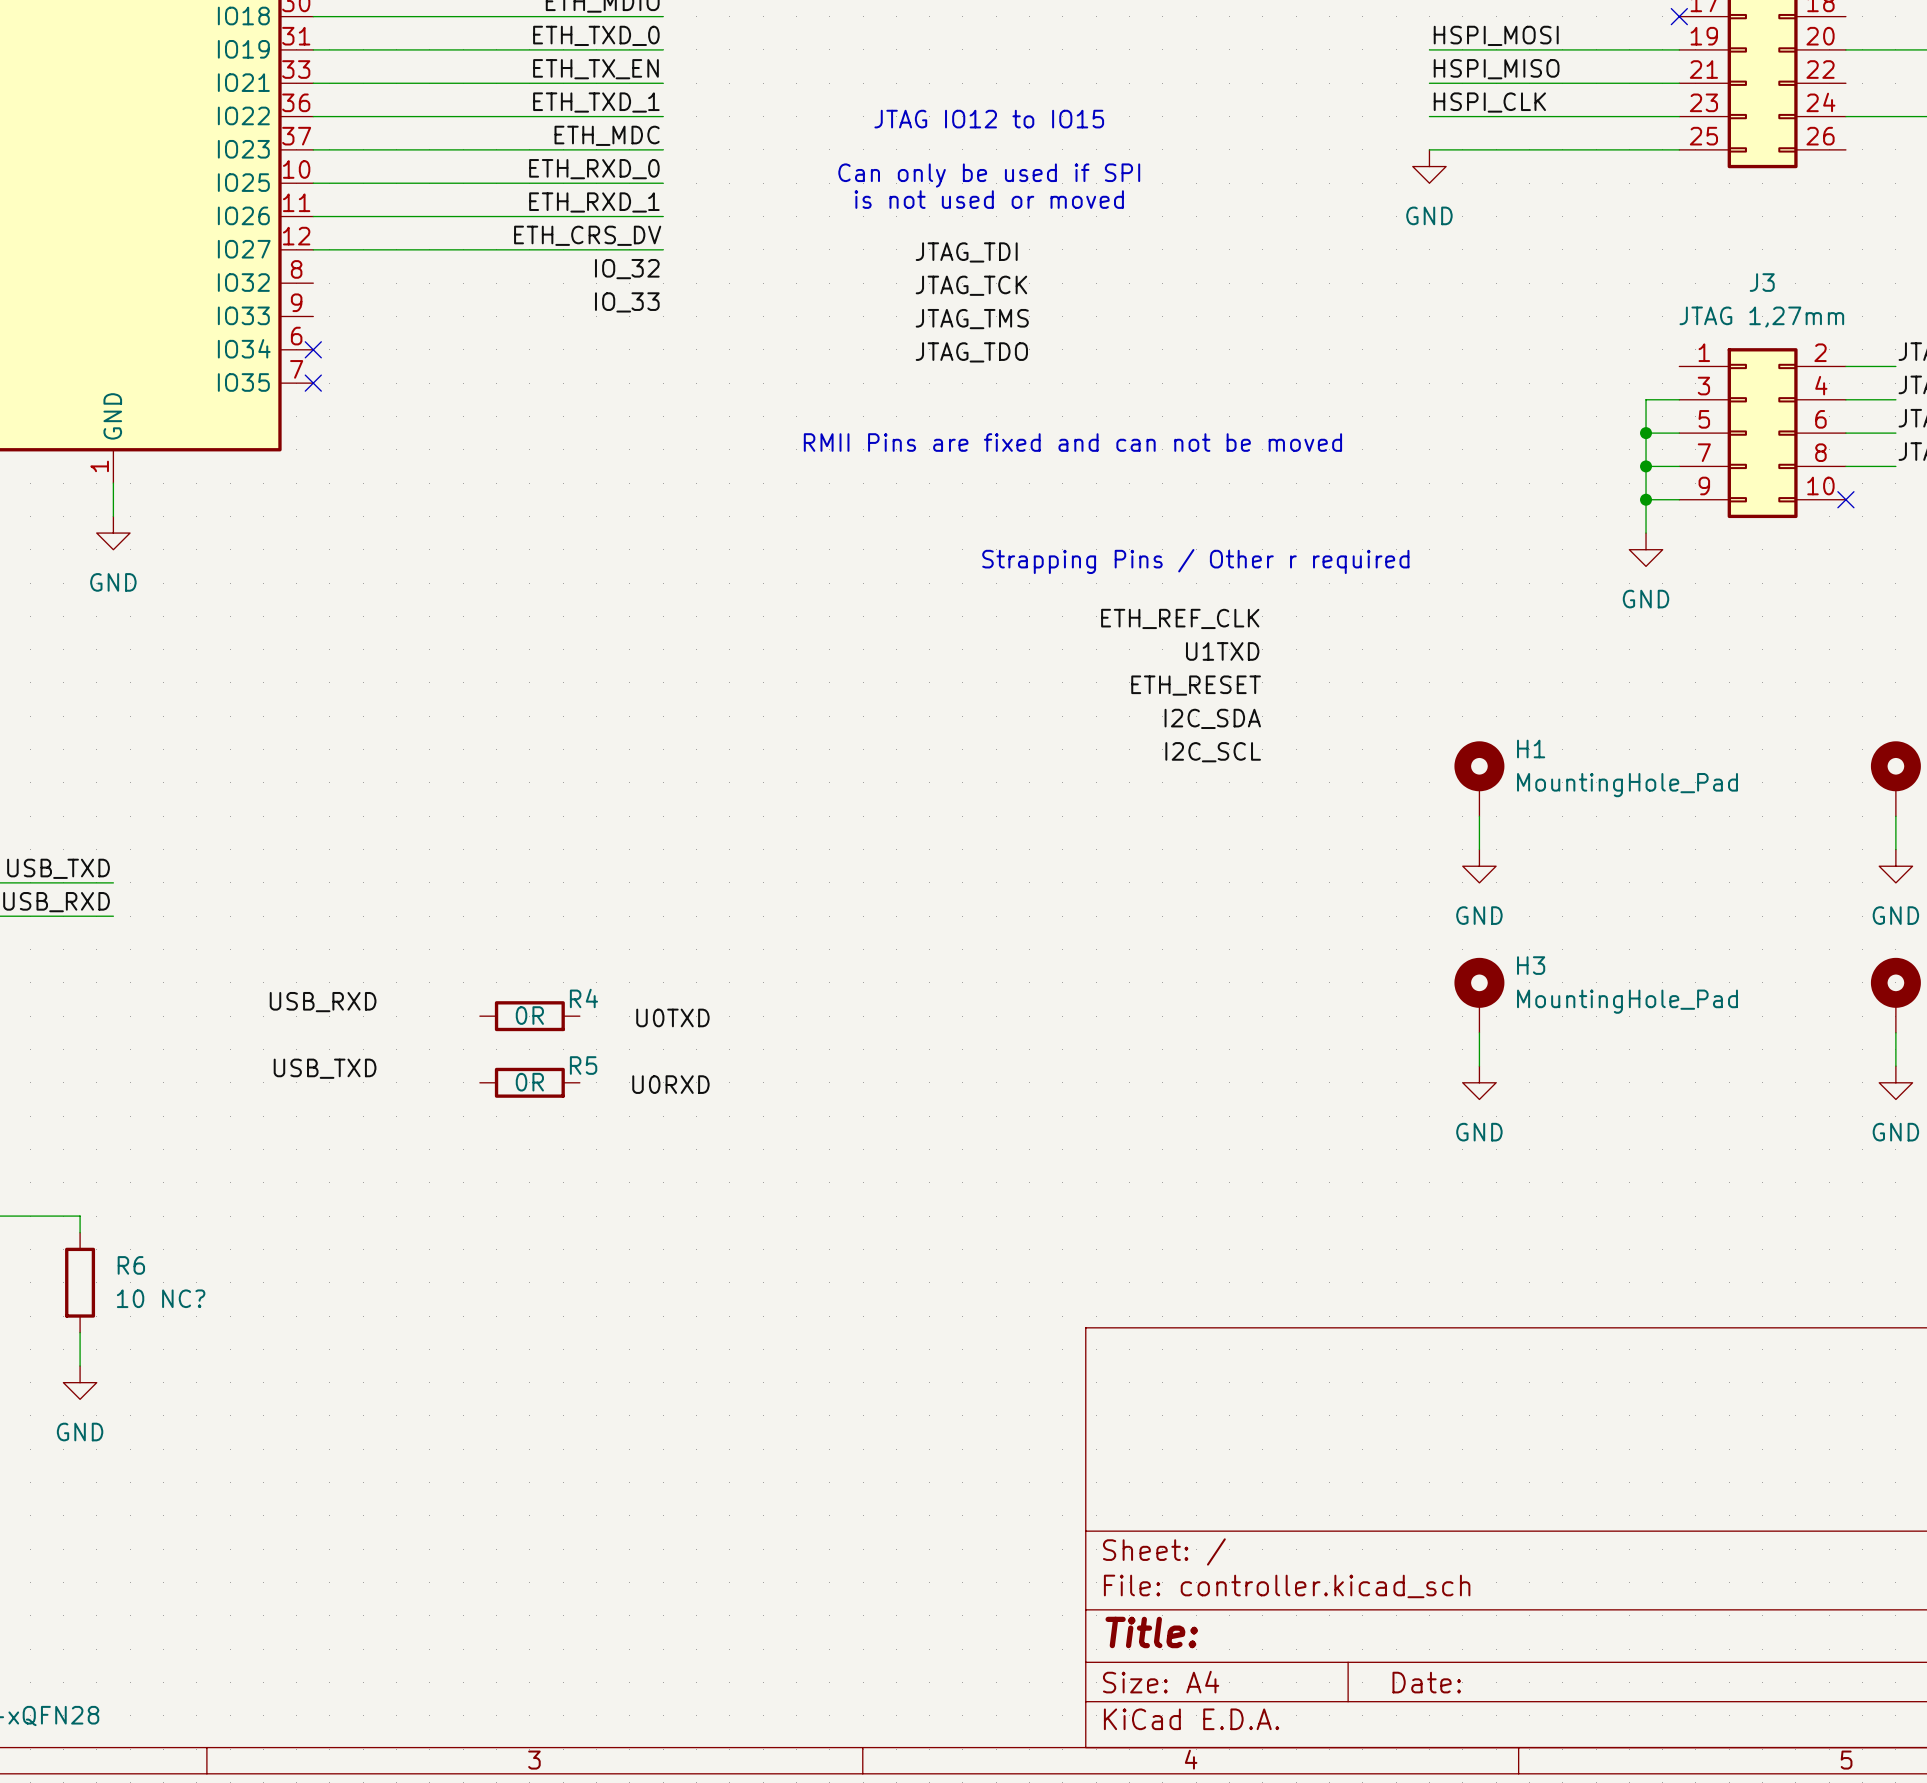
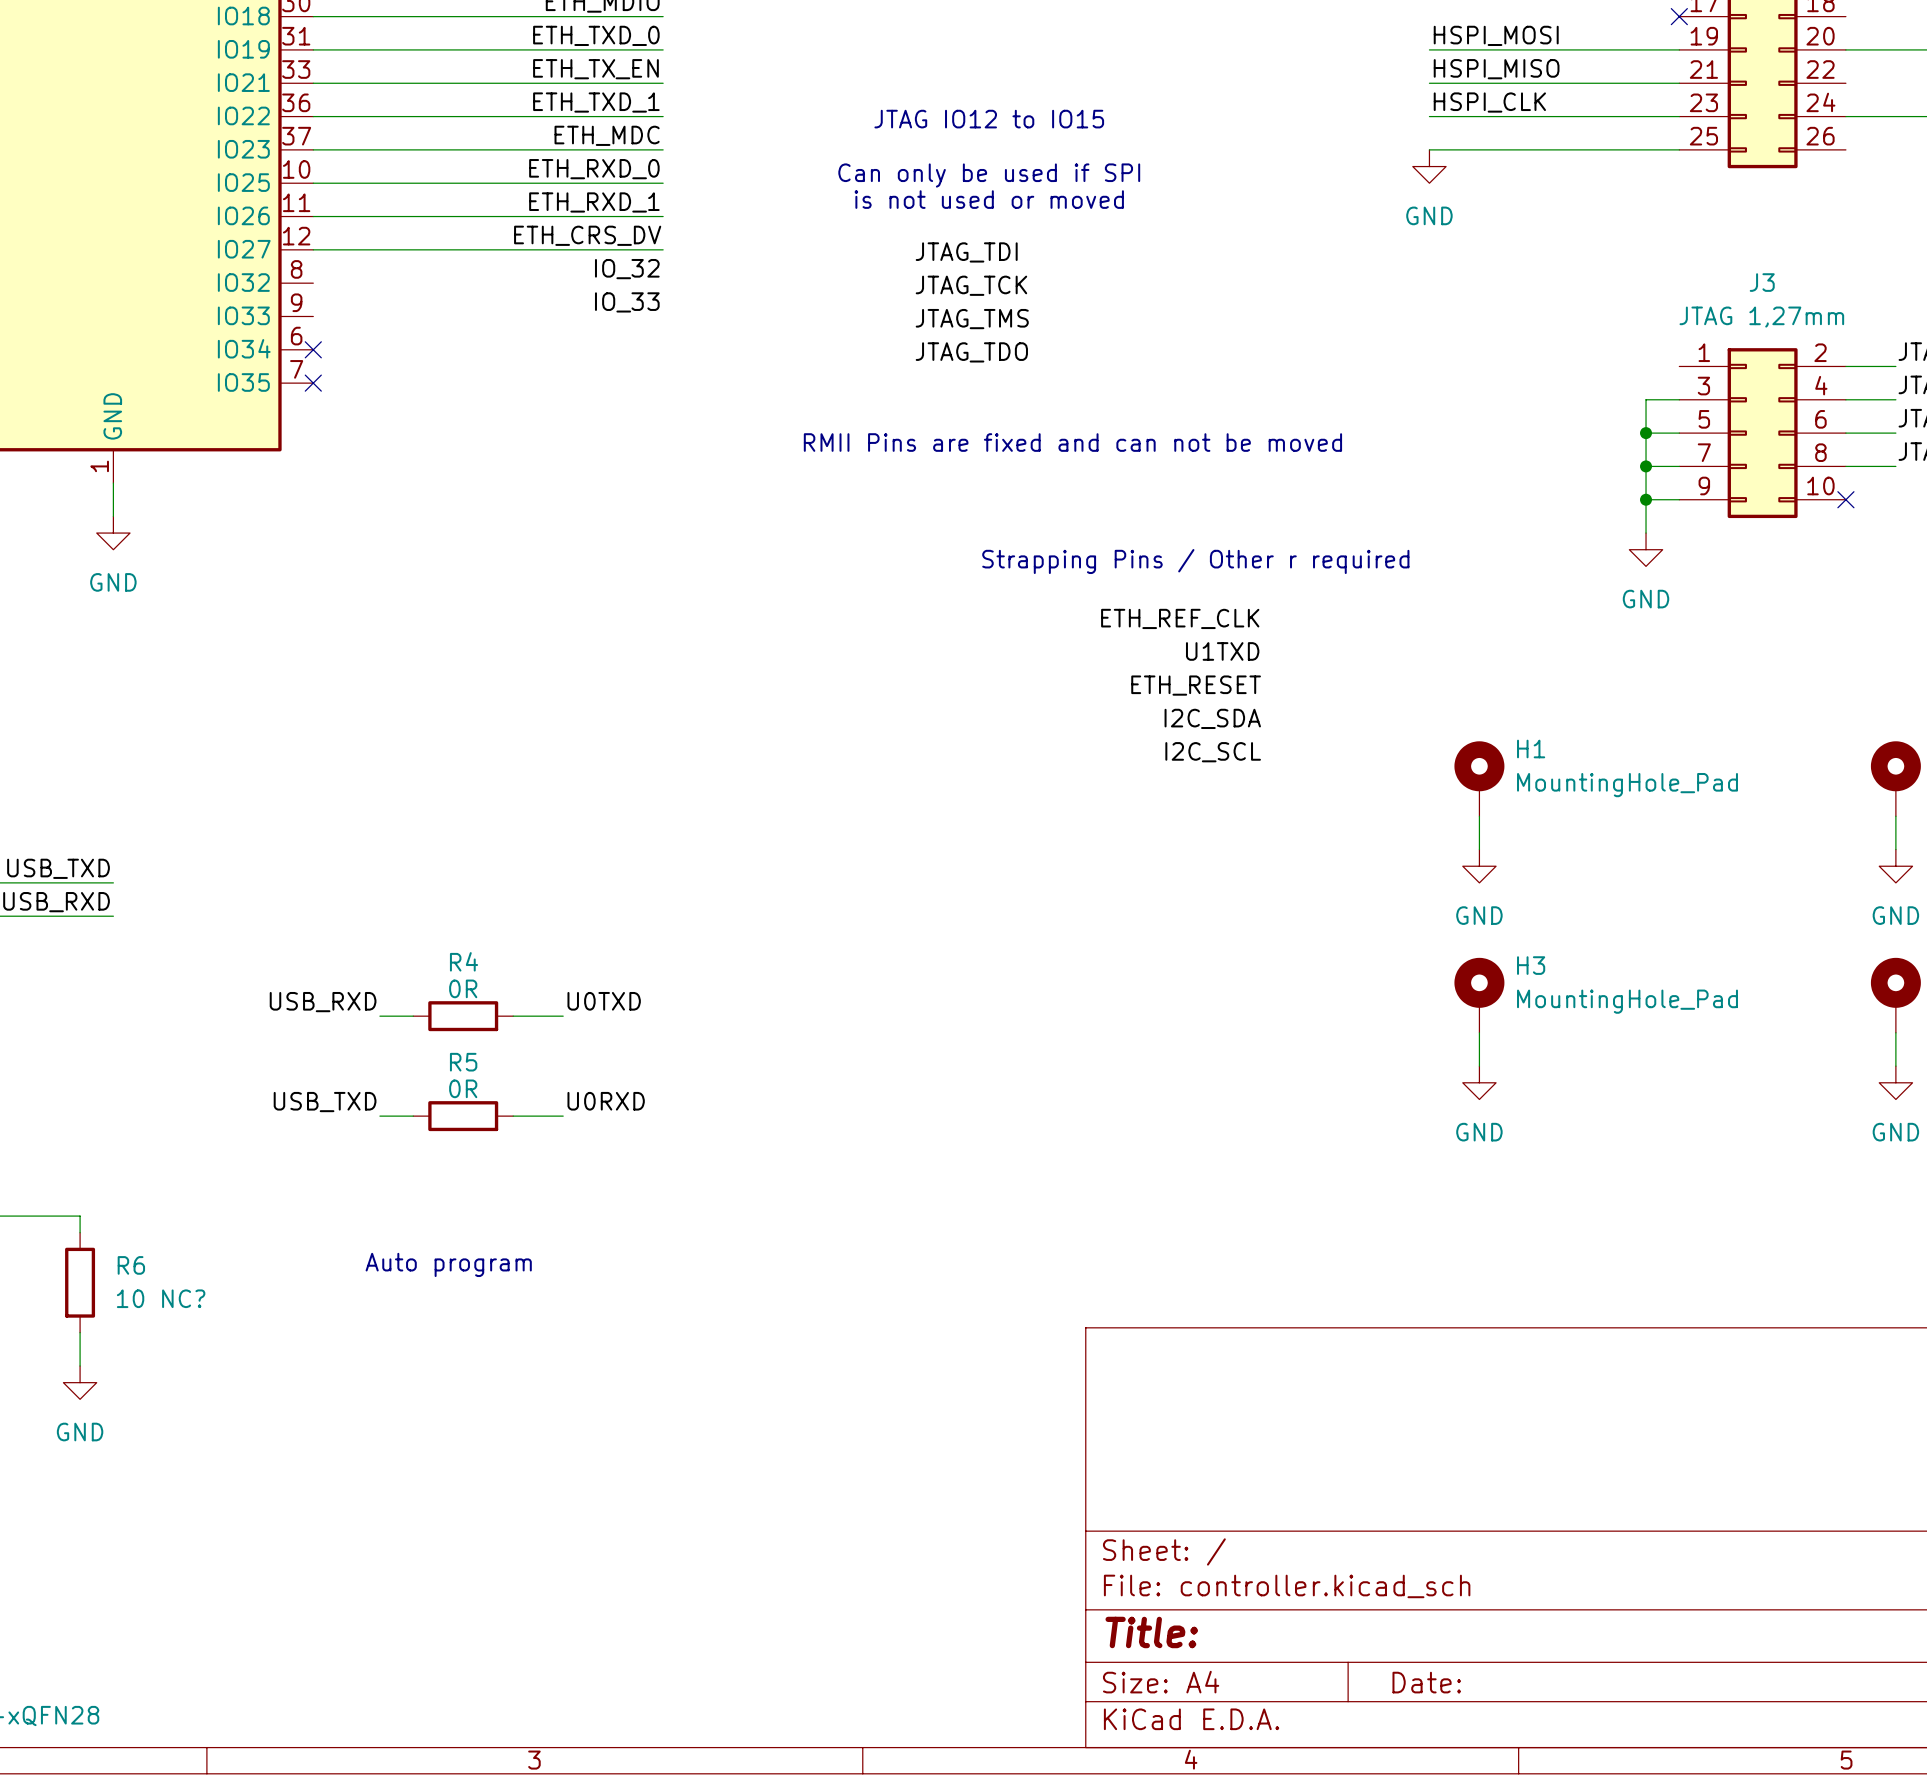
R4 name position: R4 (583, 998) -> R4 (464, 961)
R4 value position: 0R (529, 1015) -> 0R (463, 988)
wire: none -> (379, 1016) (413, 1016)
wire: none -> (513, 1016) (563, 1016)
R4 position: (529, 1016) -> (463, 1016)
label position: U0TXD (672, 1017) -> U0TXD (604, 1001)
R5 name position: R5 (583, 1065) -> R5 (463, 1062)
label position: USB_TXD (325, 1068) -> USB_TXD (325, 1102)
R5 position: (529, 1082) -> (463, 1116)
R5 value position: 0R (529, 1082) -> 0R (463, 1088)
label position: U0RXD (670, 1084) -> U0RXD (606, 1101)
wire: none -> (379, 1116) (413, 1116)
wire: none -> (513, 1116) (563, 1116)
text: none -> Auto program (448, 1264)

